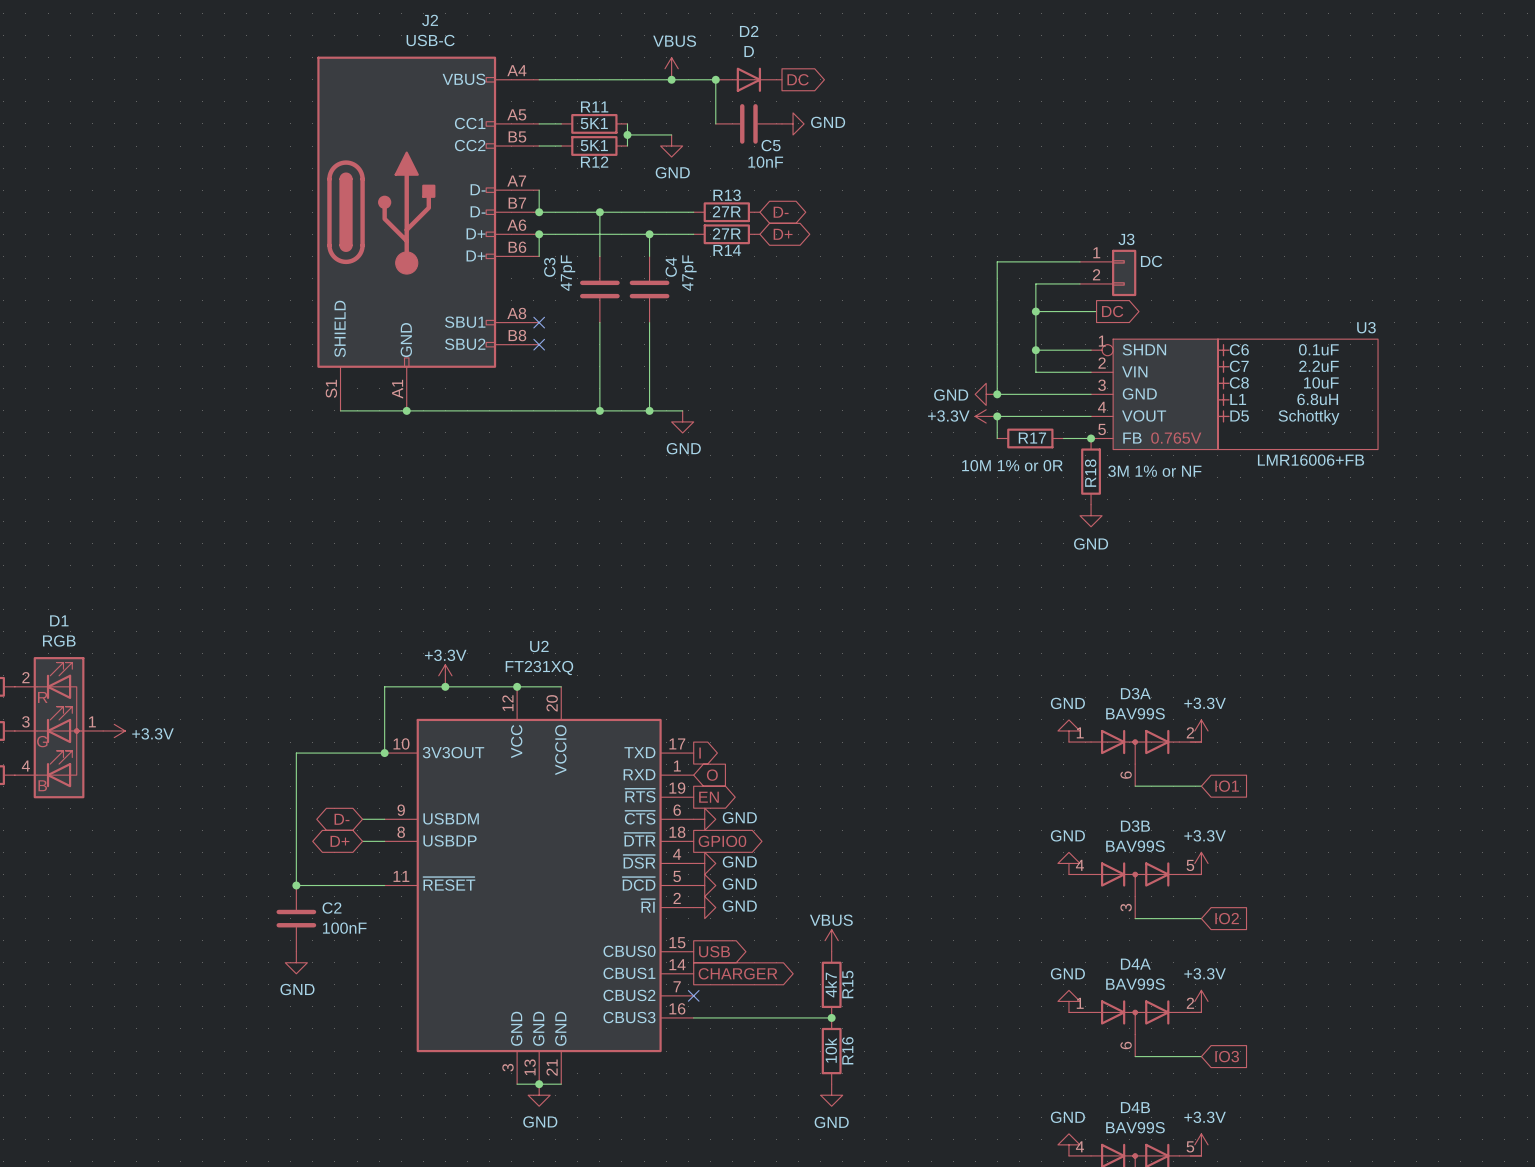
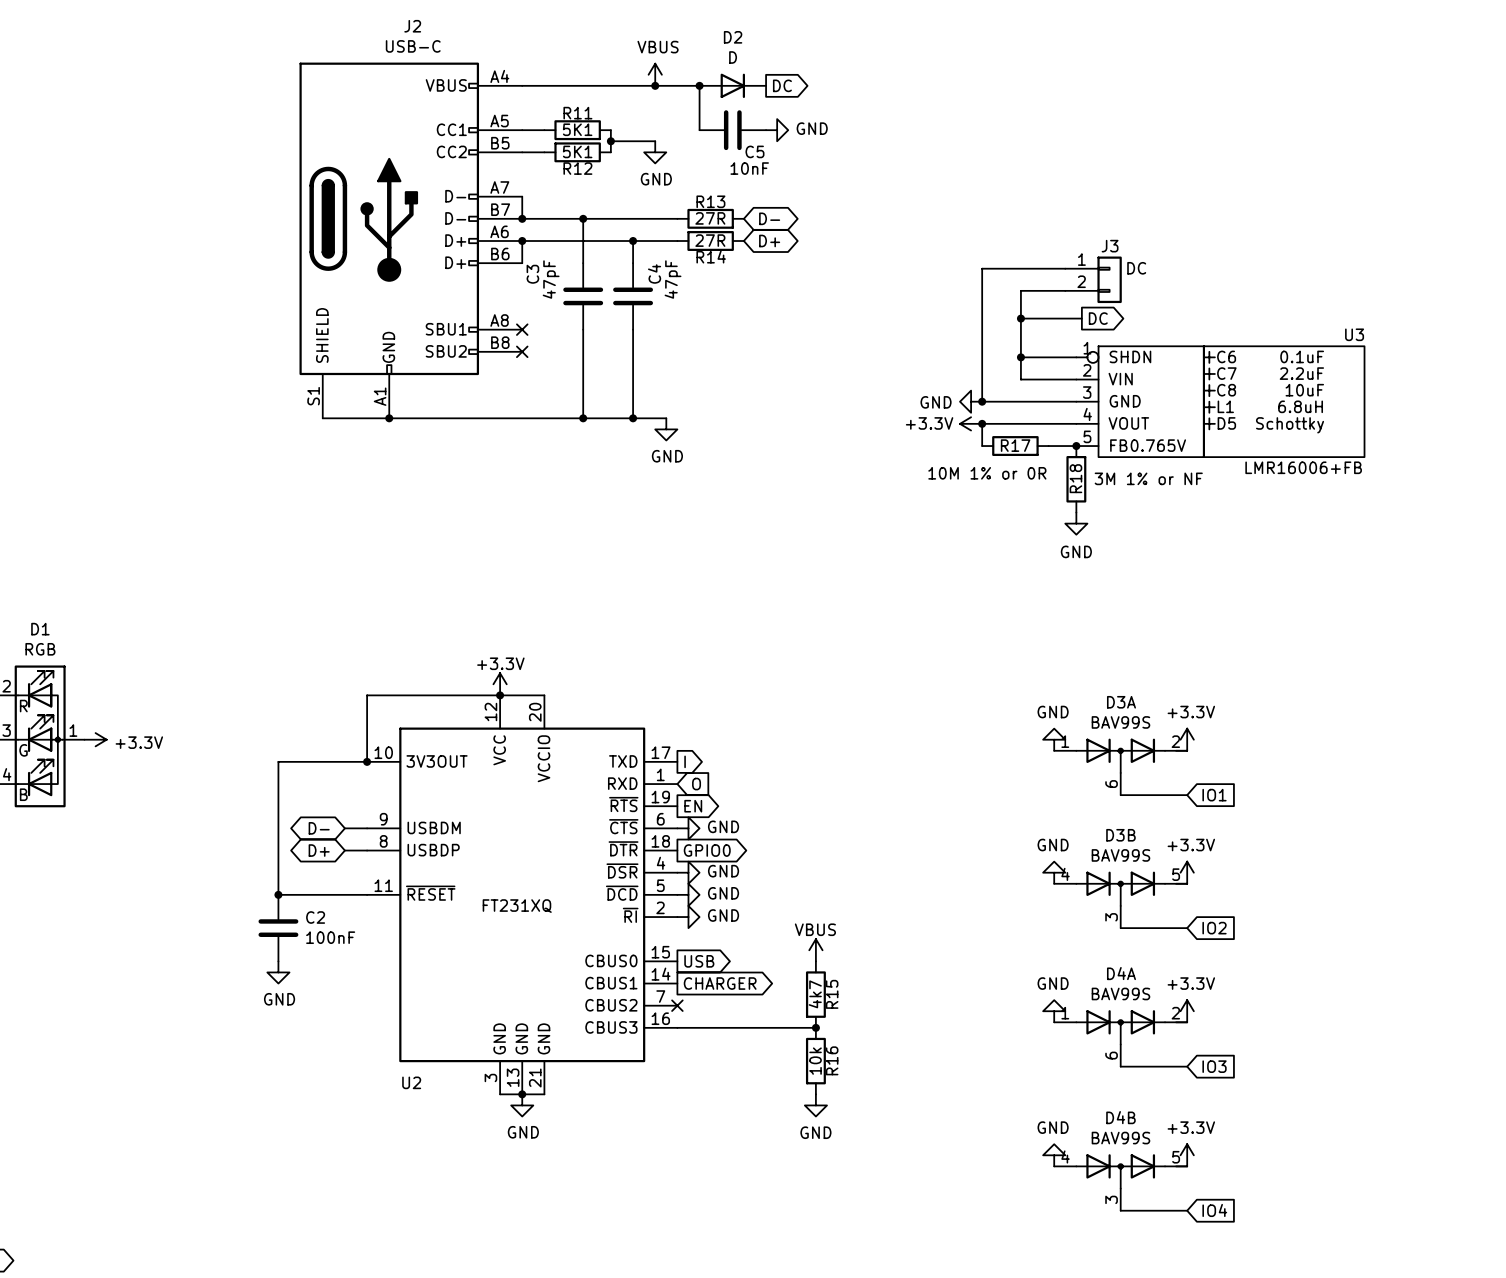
U2 name position: U2 (539, 646) -> U2 (411, 1082)
U2 value position: FT231XQ (539, 667) -> FT231XQ (517, 906)
power symbol position: +3.3V (445, 675) -> +3.3V (500, 684)
junction: (445, 686) -> none

